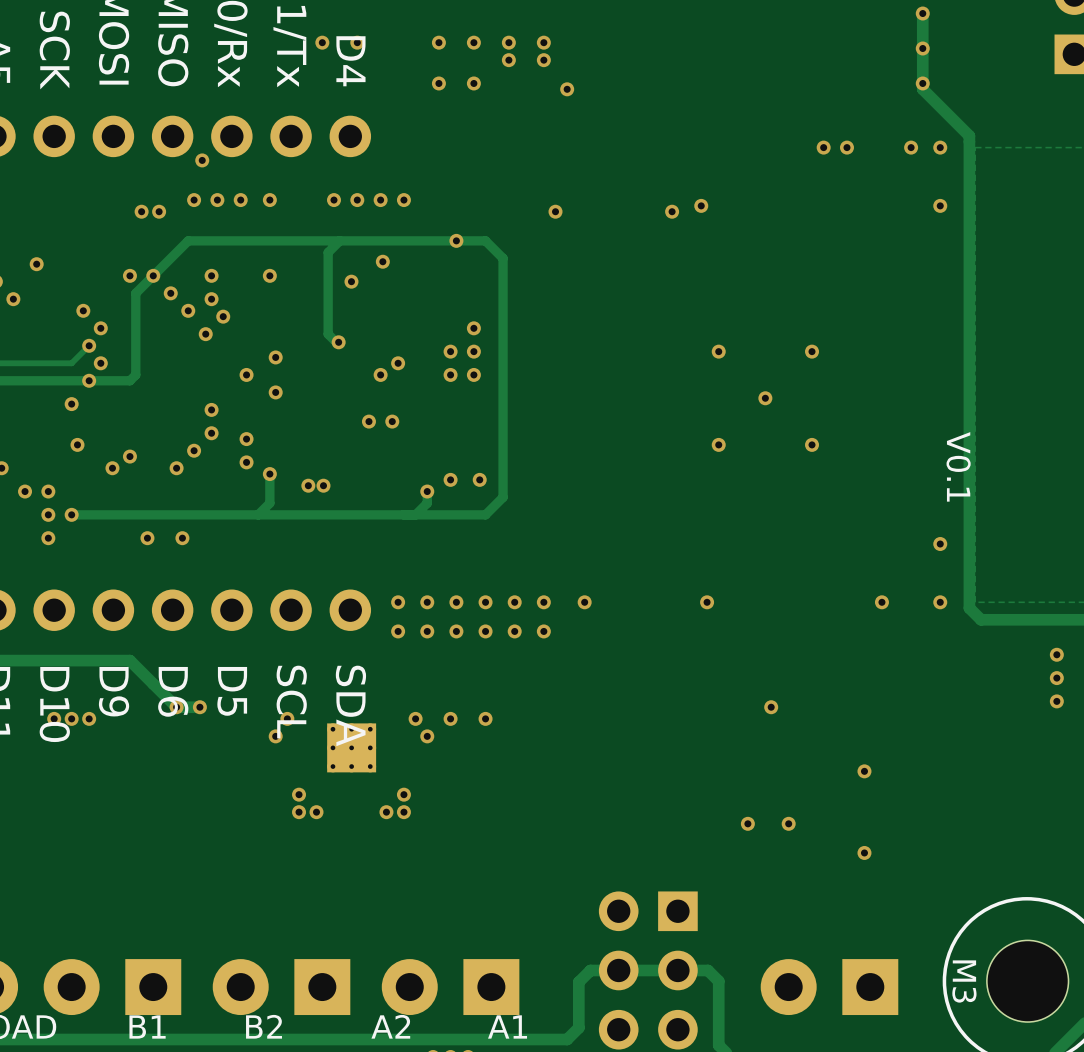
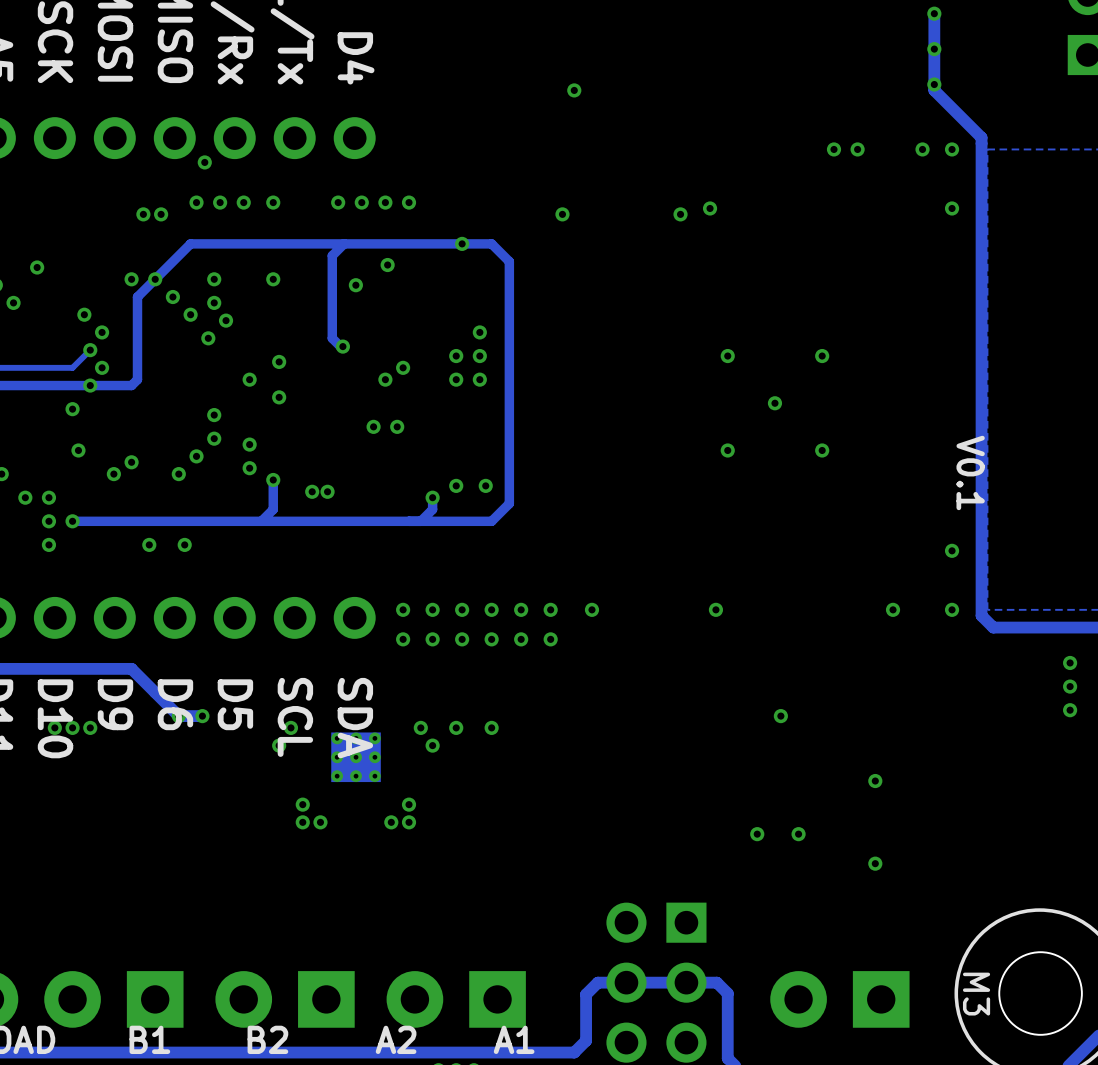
via: (322, 42) -> none
via: (357, 42) -> none
via: (438, 42) -> none
via: (473, 42) -> none
via: (508, 42) -> none
via: (543, 42) -> none
via: (508, 60) -> none
via: (543, 60) -> none
via: (438, 83) -> none
via: (473, 83) -> none

